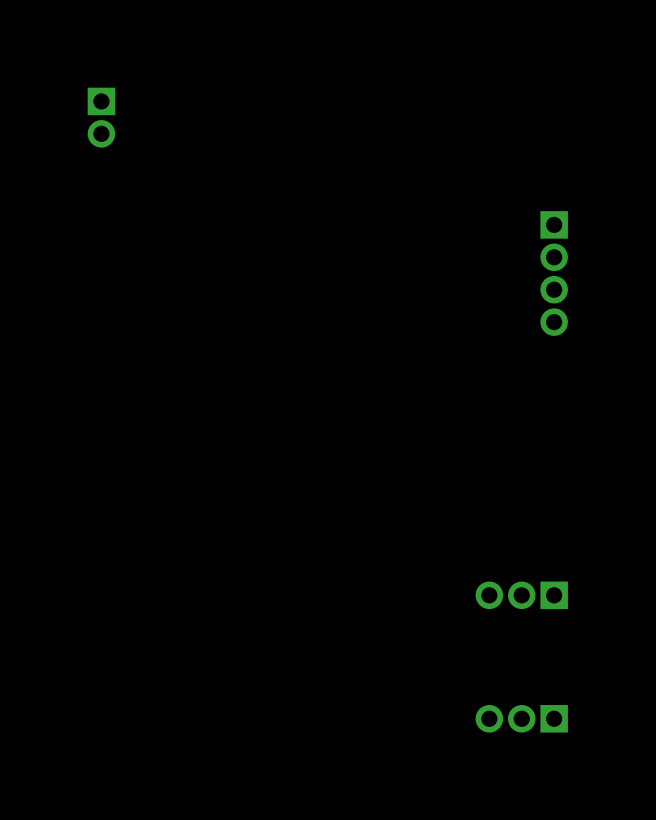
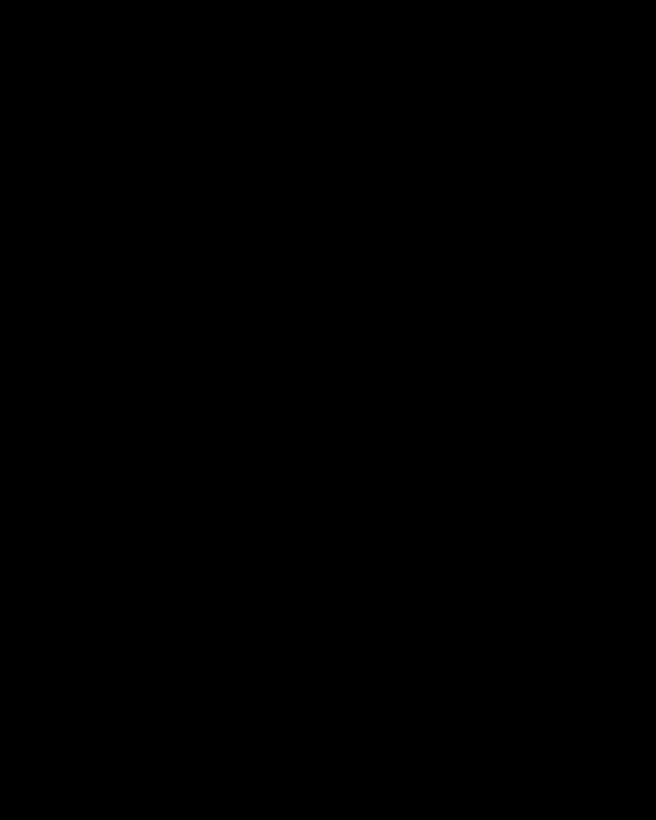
part: (101, 117) -> none
part: (554, 273) -> none
part: (521, 595) -> none
part: (521, 718) -> none

